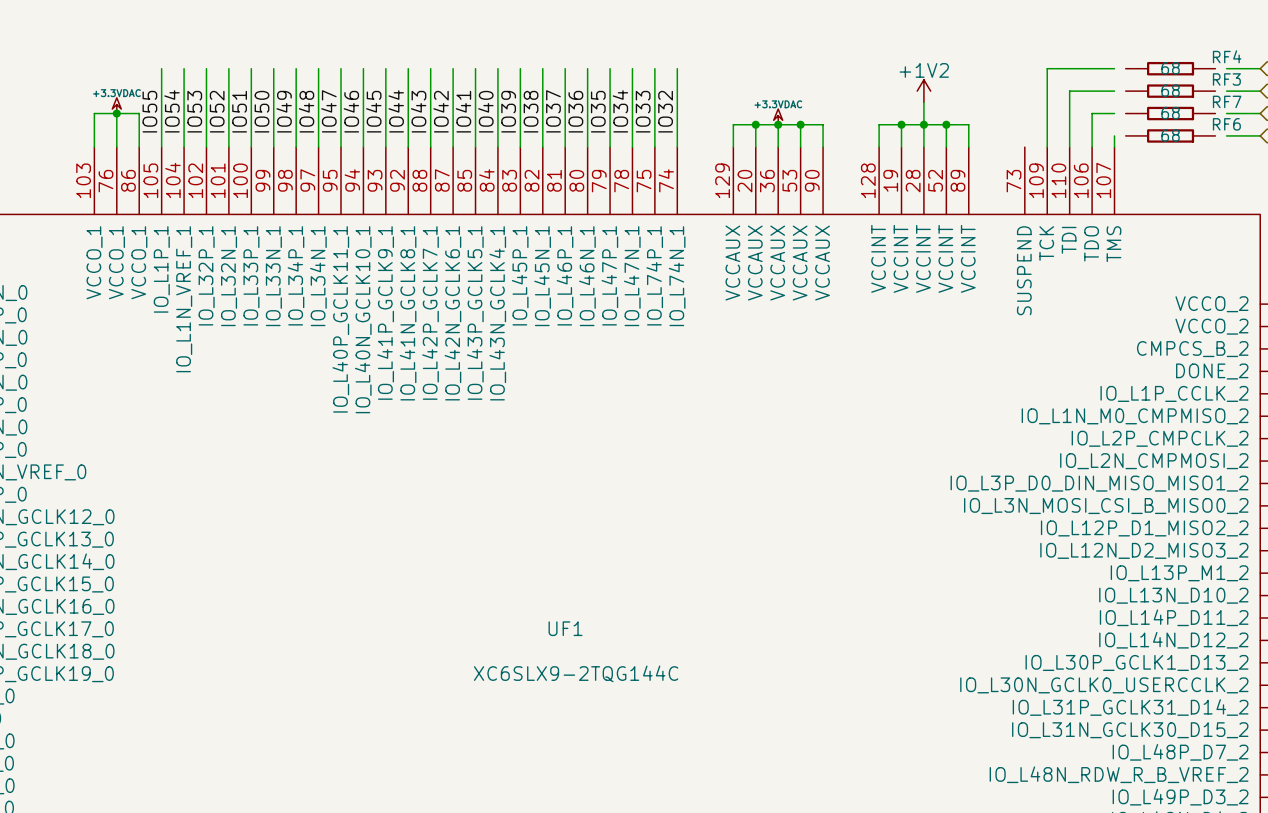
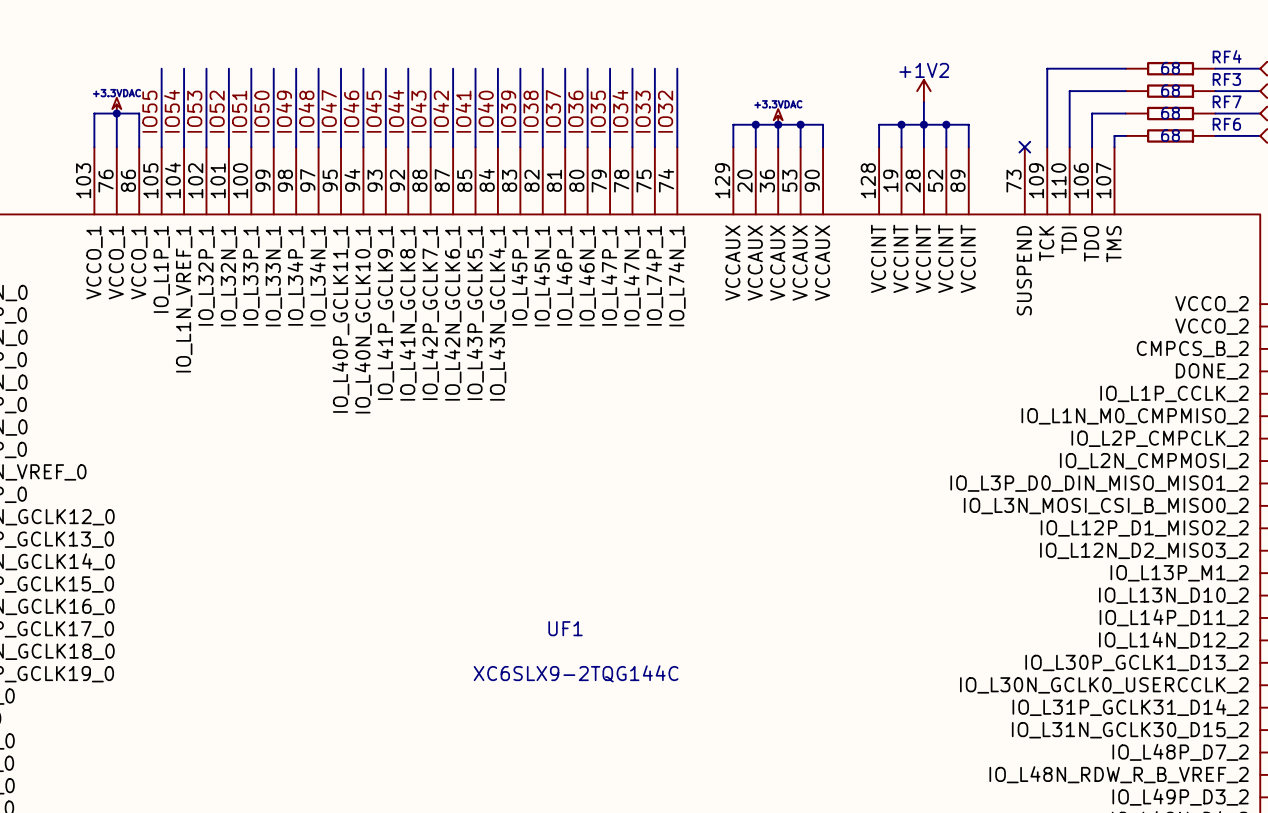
wire: none -> (1114, 68) (1125, 68)
wire: none -> (1215, 68) (1226, 68)
wire: none -> (1114, 91) (1125, 91)
wire: none -> (1215, 91) (1226, 91)
wire: none -> (1114, 113) (1125, 113)
wire: none -> (1215, 113) (1226, 113)
wire: none -> (1114, 135) (1125, 135)
wire: none -> (1215, 135) (1226, 135)
no-connect mark: none -> (1024, 147)

